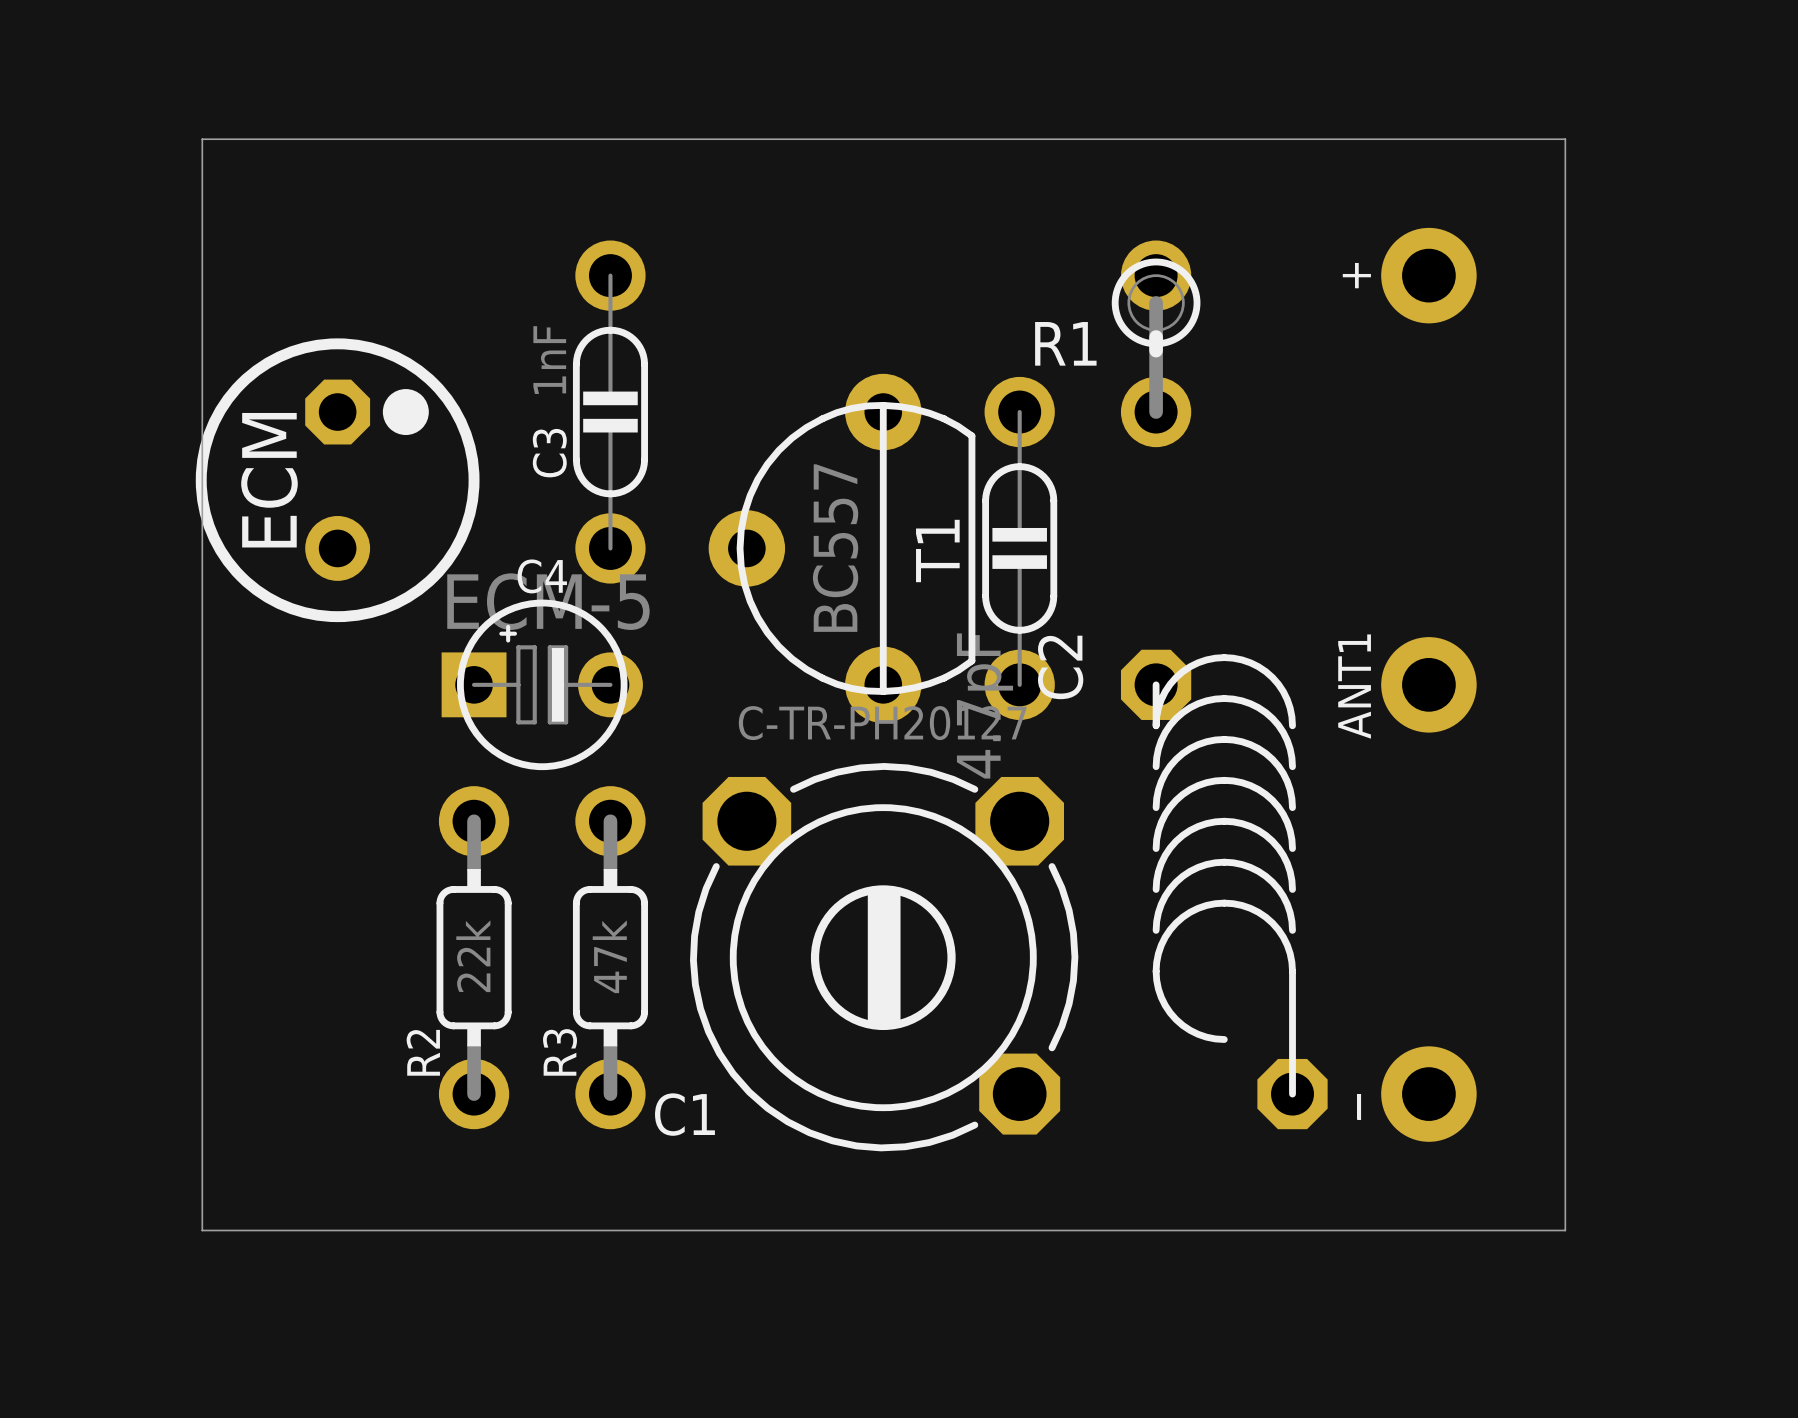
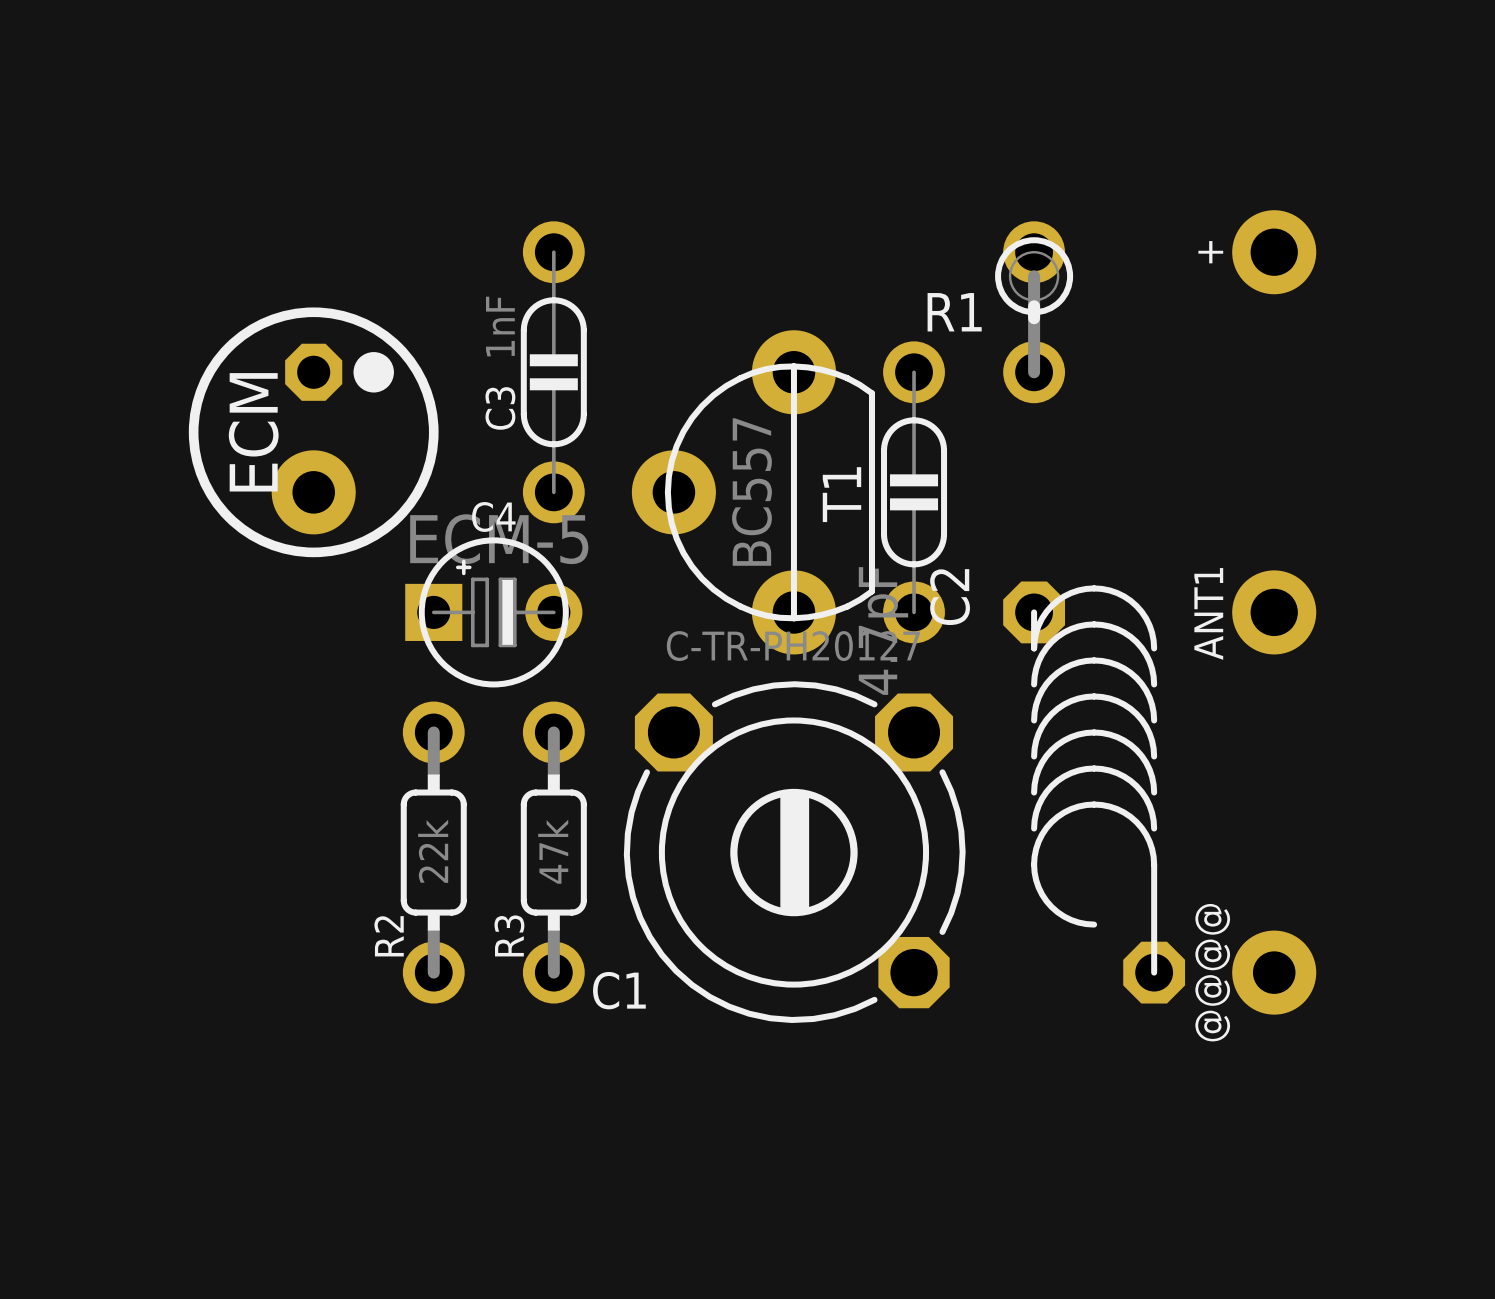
board edge: (202, 139) (1565, 139) (1565, 1230) (202, 1230) (202, 139) -> none
ECM footprint: [195, 338, 480, 623] -> [188, 307, 439, 558]
T1 footprint: [708, 373, 976, 724] -> [631, 330, 876, 655]
part: (1428, 1094) -> none
part: none -> (1274, 972)

